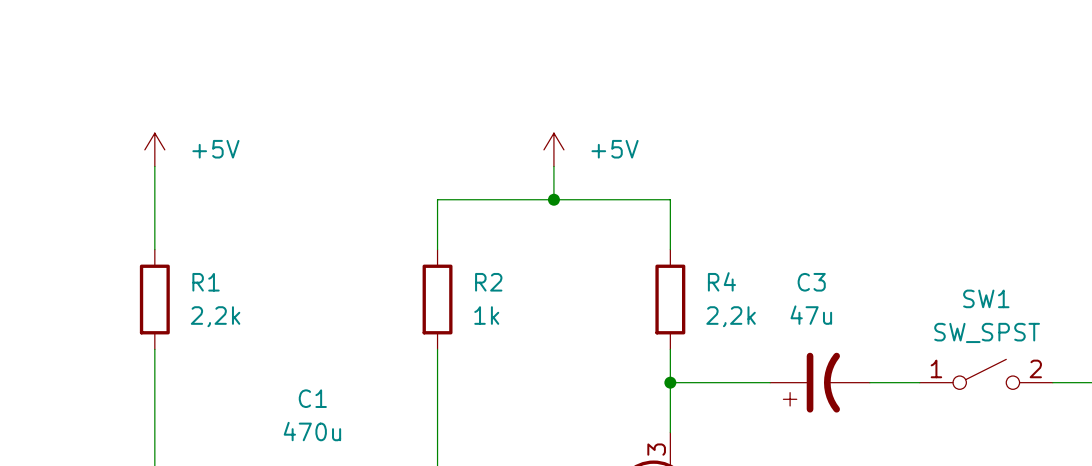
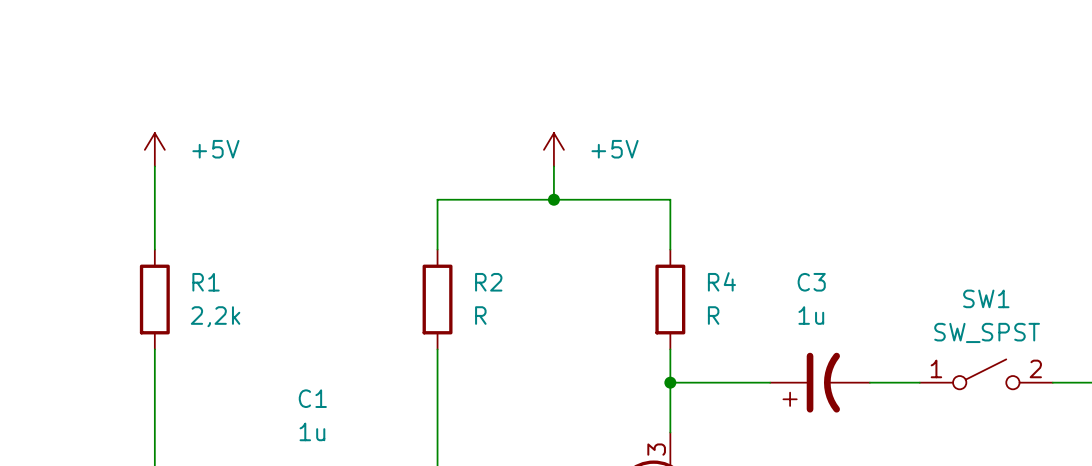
R2 value: 1k (486, 315) -> R (480, 315)
C3 value: 47u (811, 315) -> 1u (811, 315)
R4 value: 2,2k (731, 316) -> R (713, 315)
C1 value: 470u (312, 431) -> 1u (312, 431)

